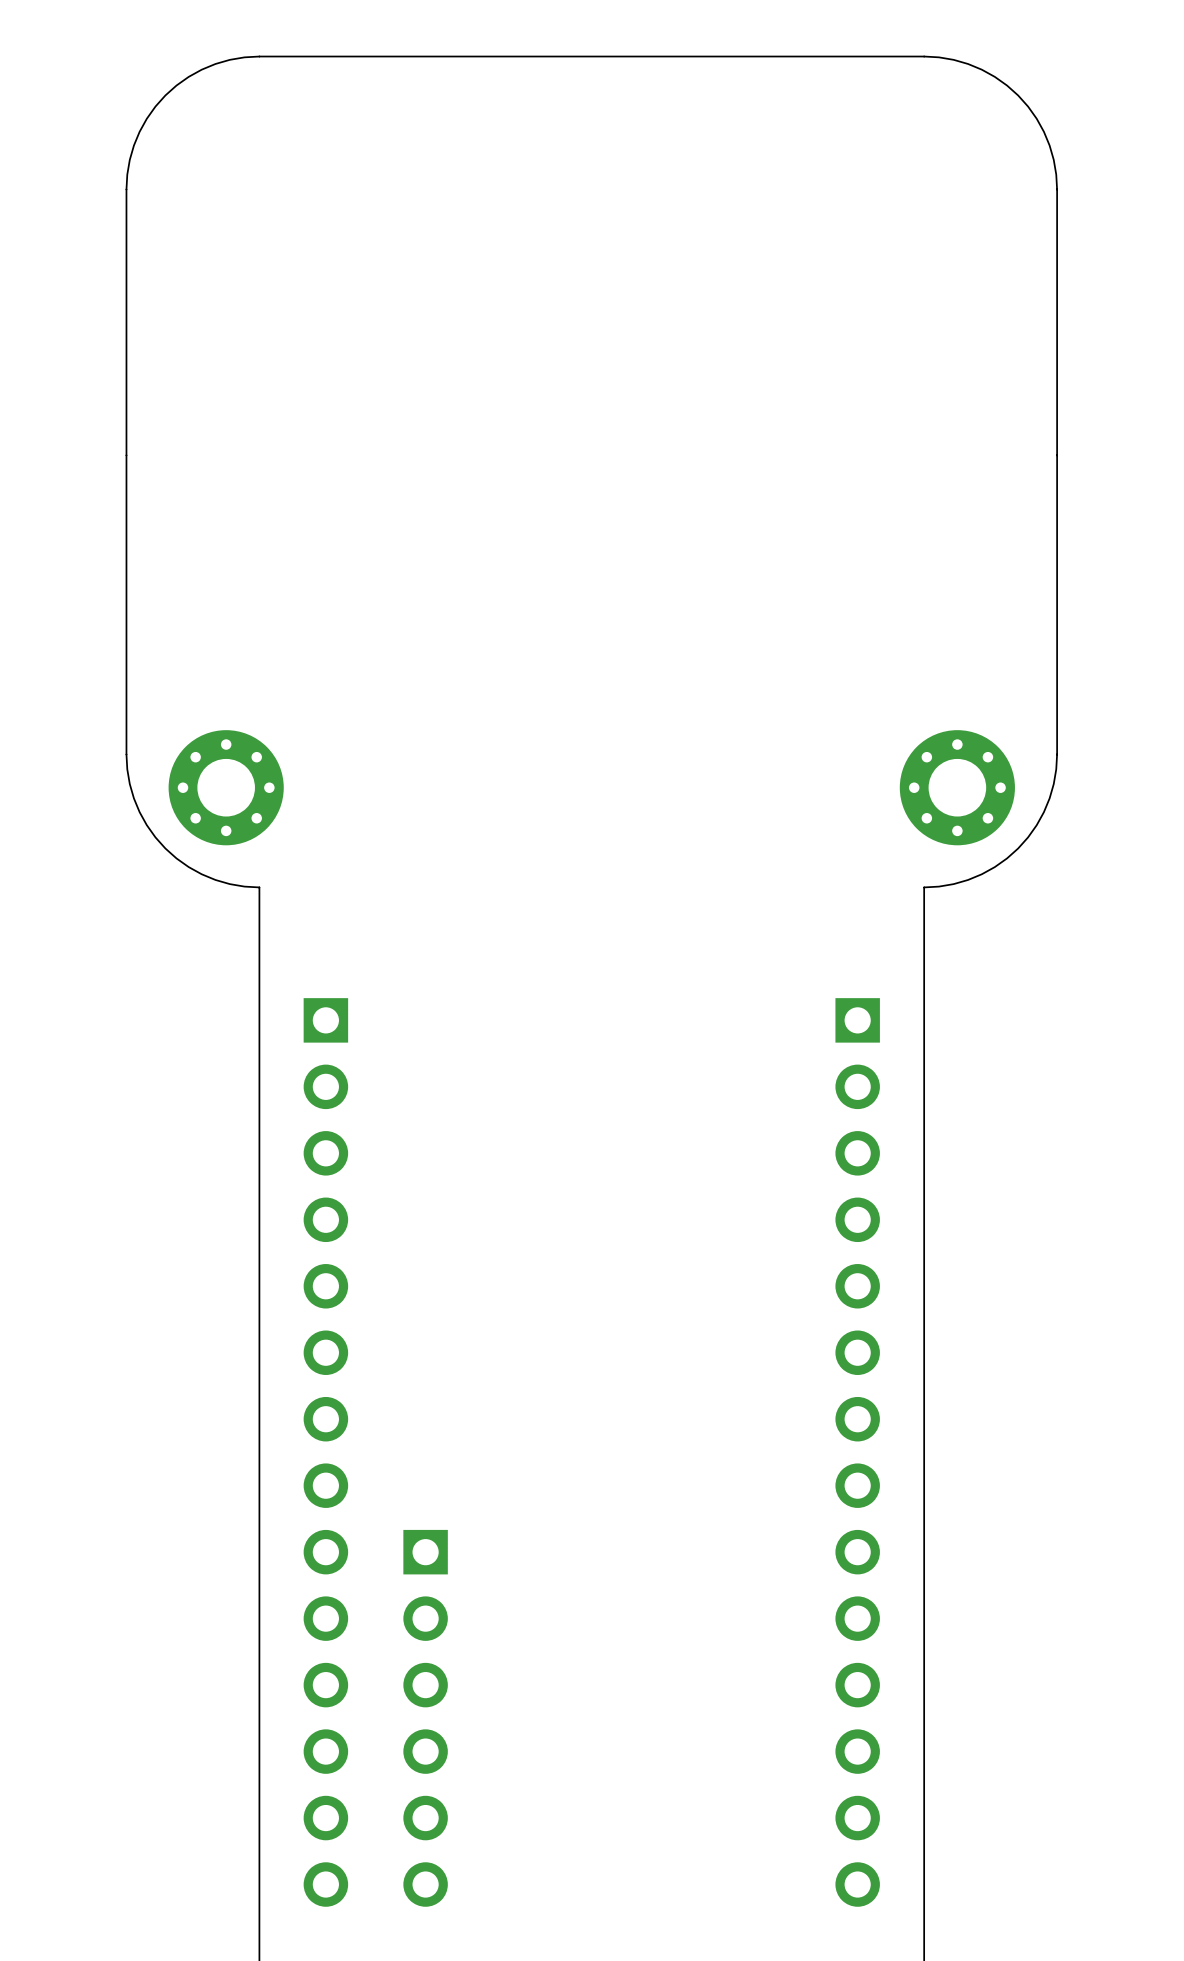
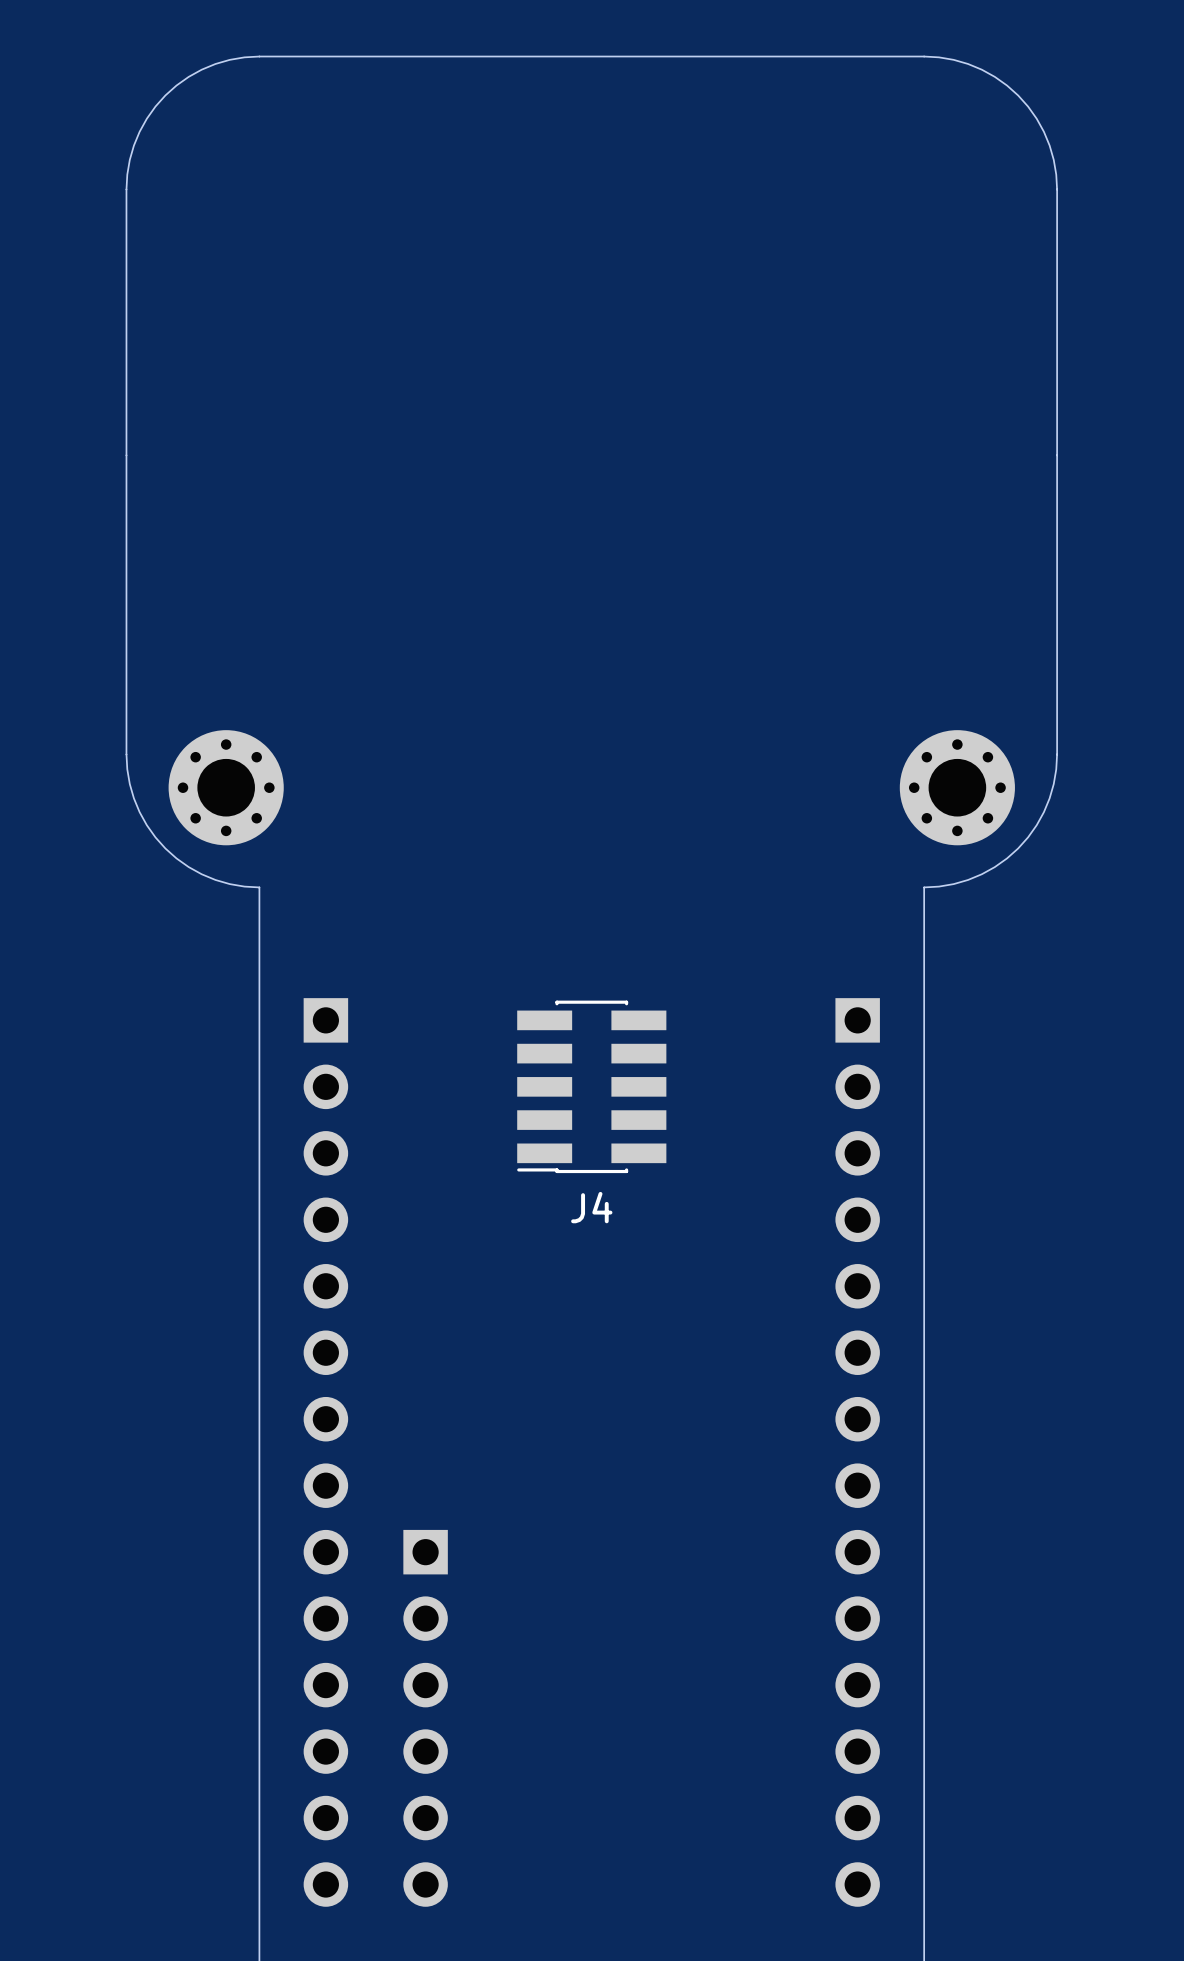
J4: none -> (591, 1086)

